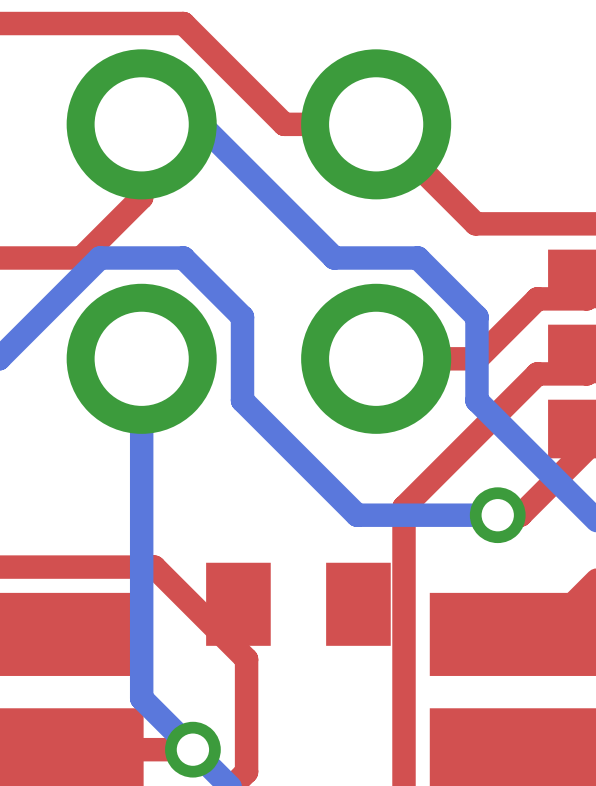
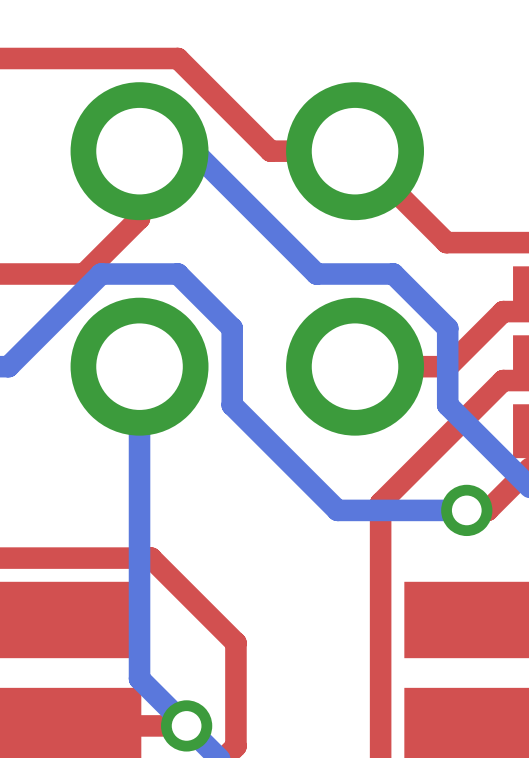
part: (298, 604) -> none

